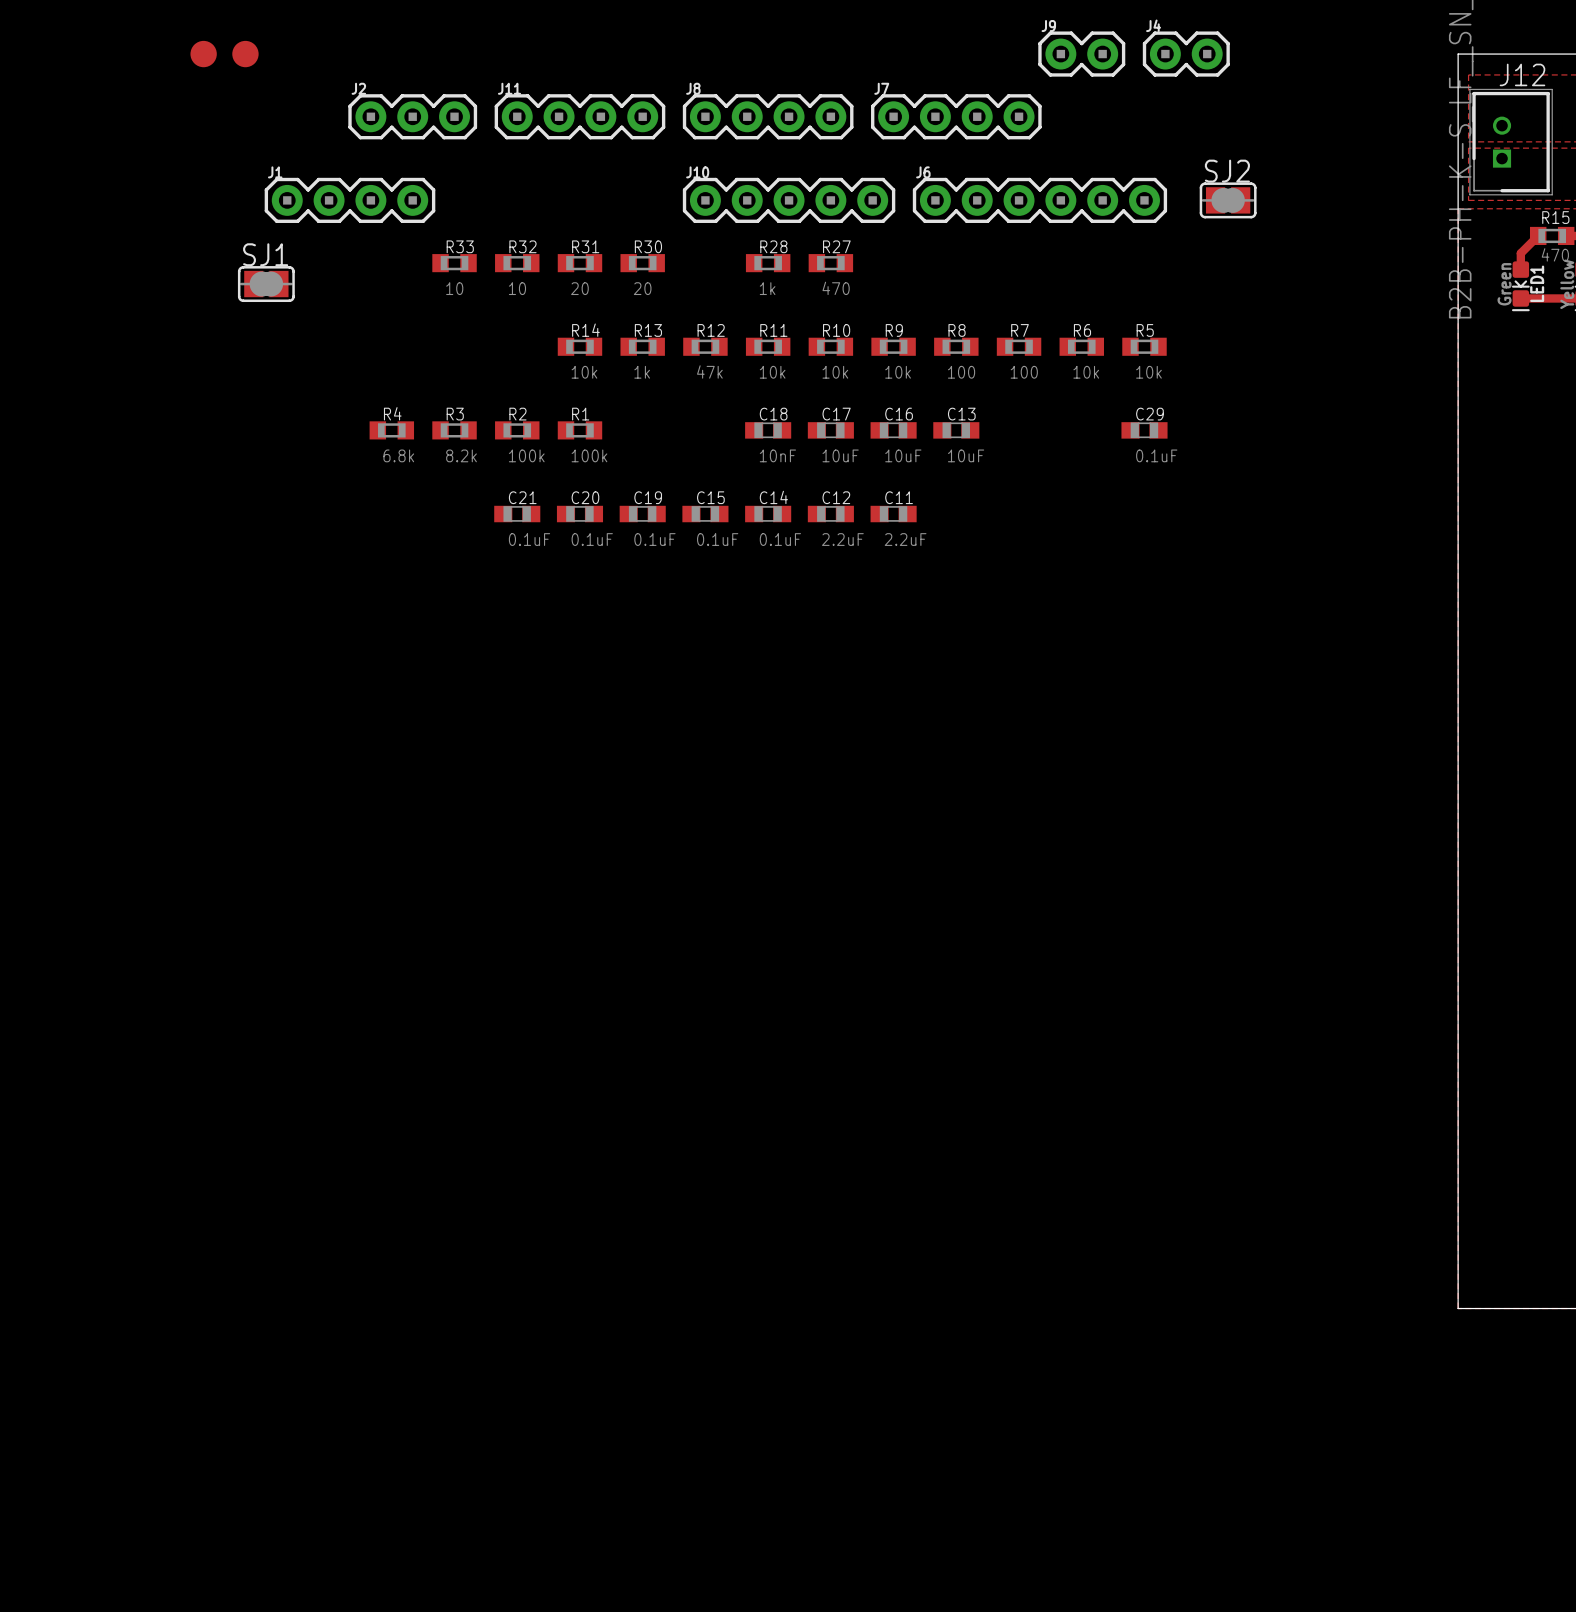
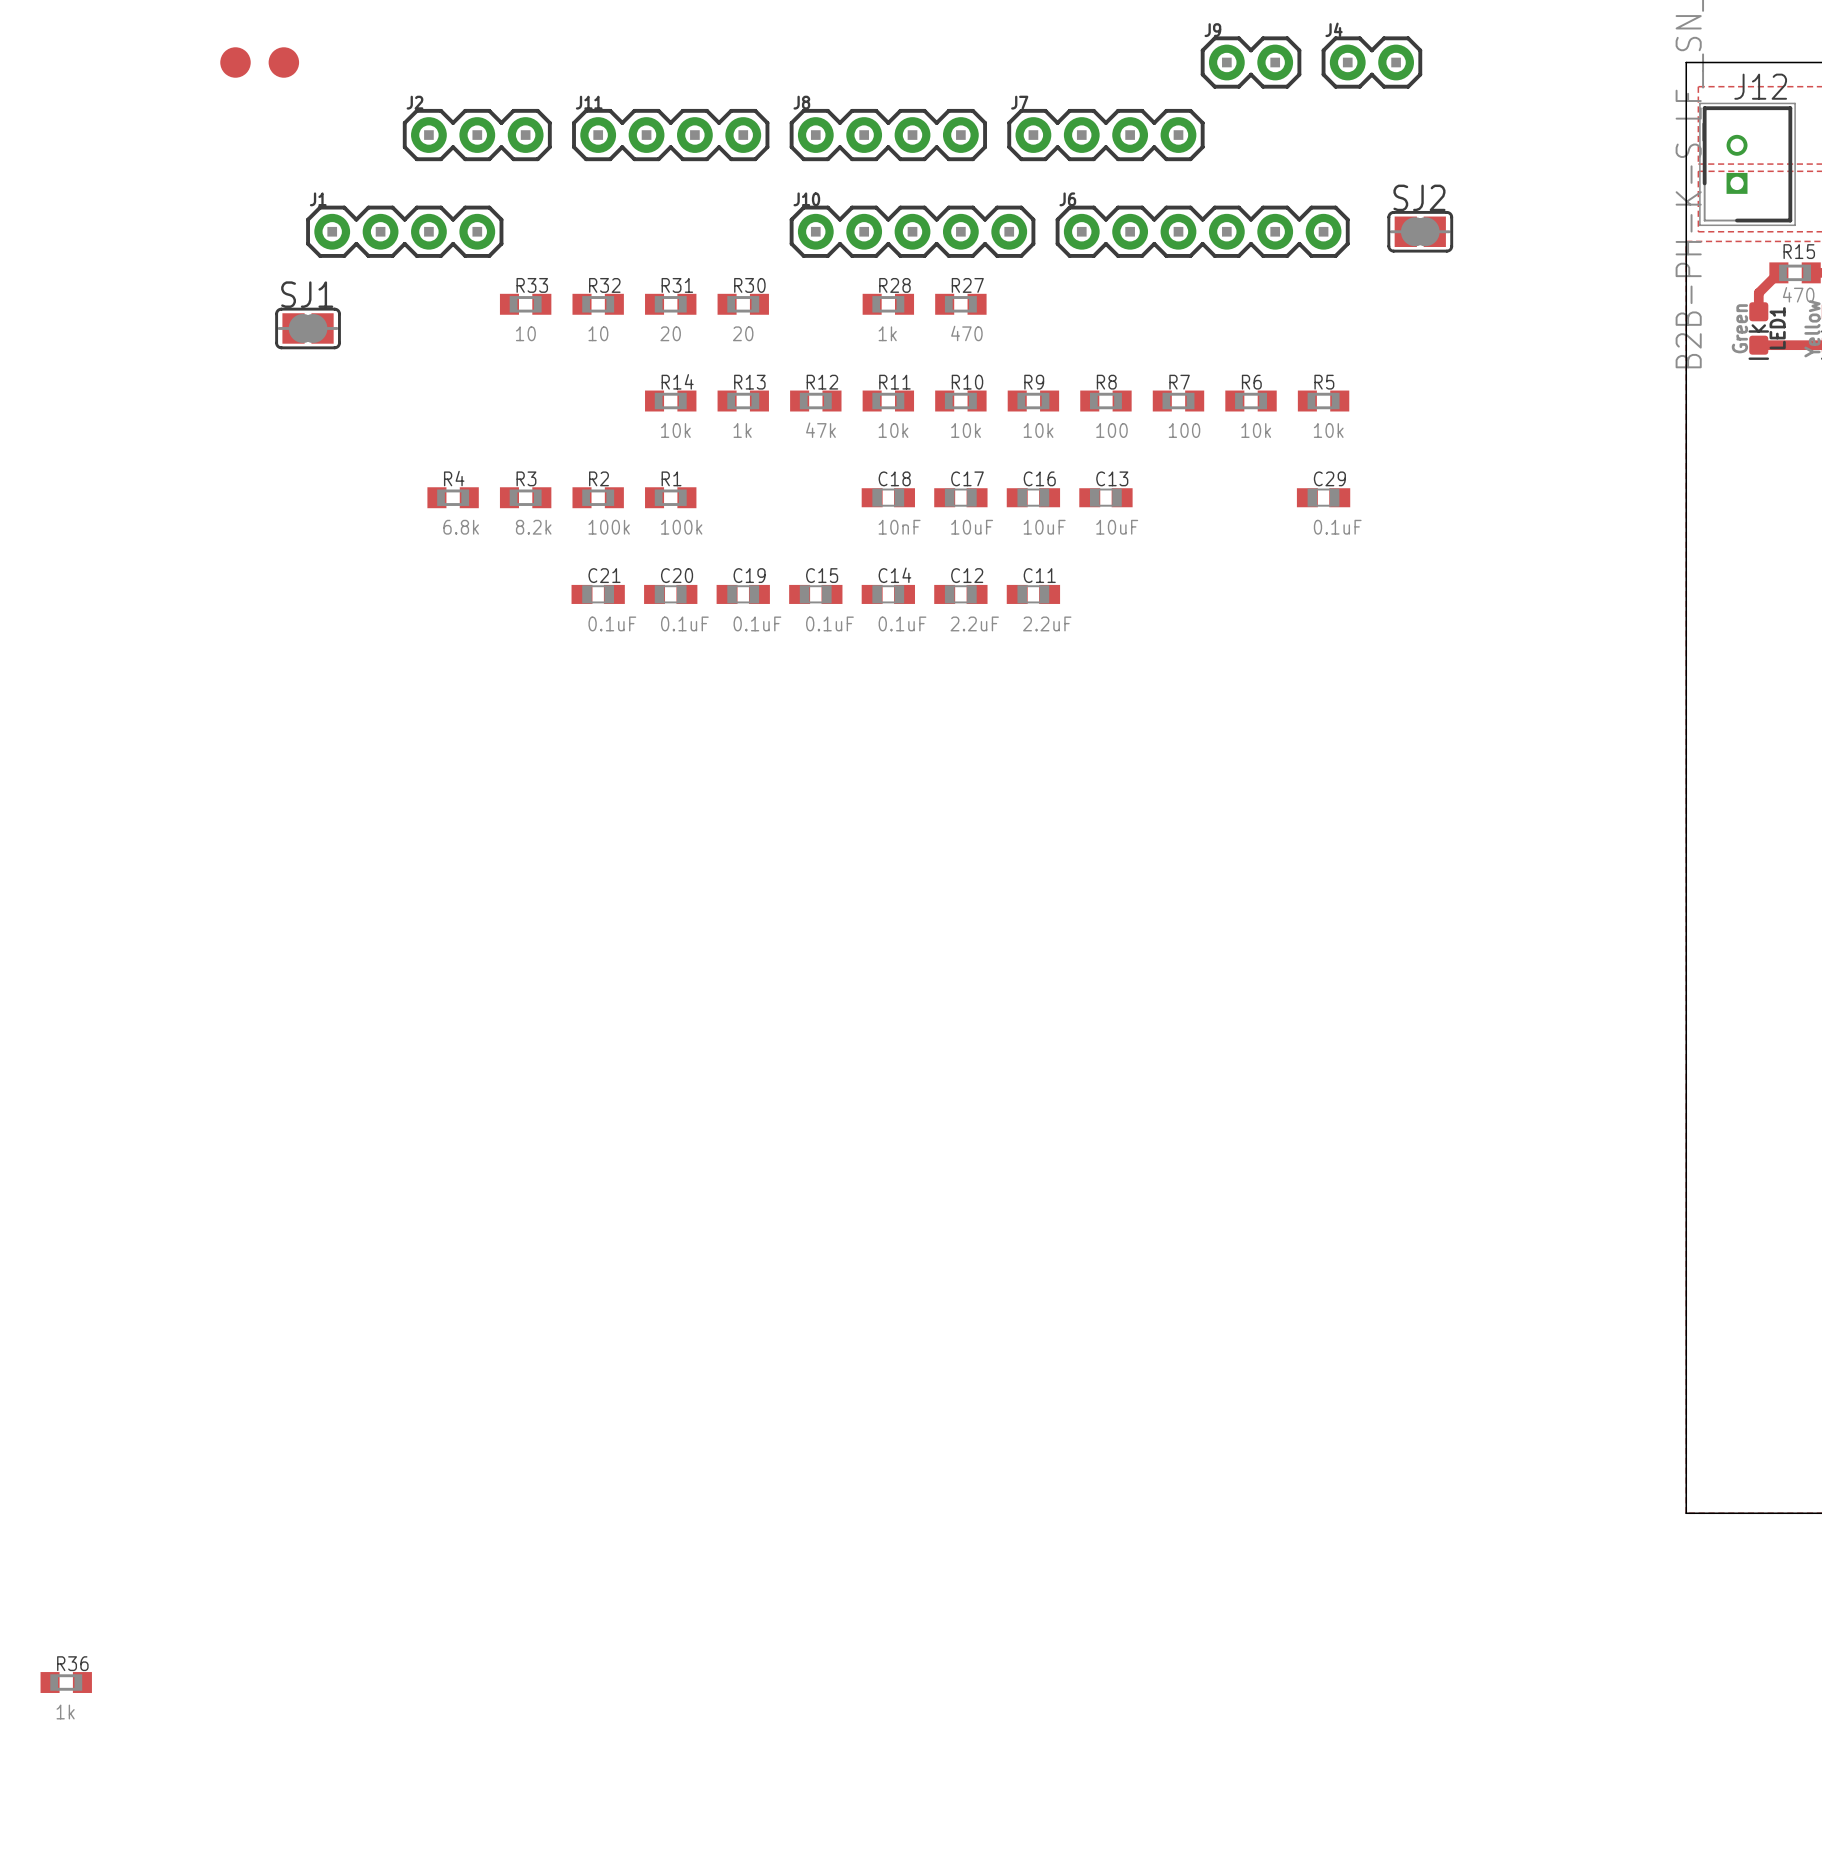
R36: none -> 1k (66, 1682)

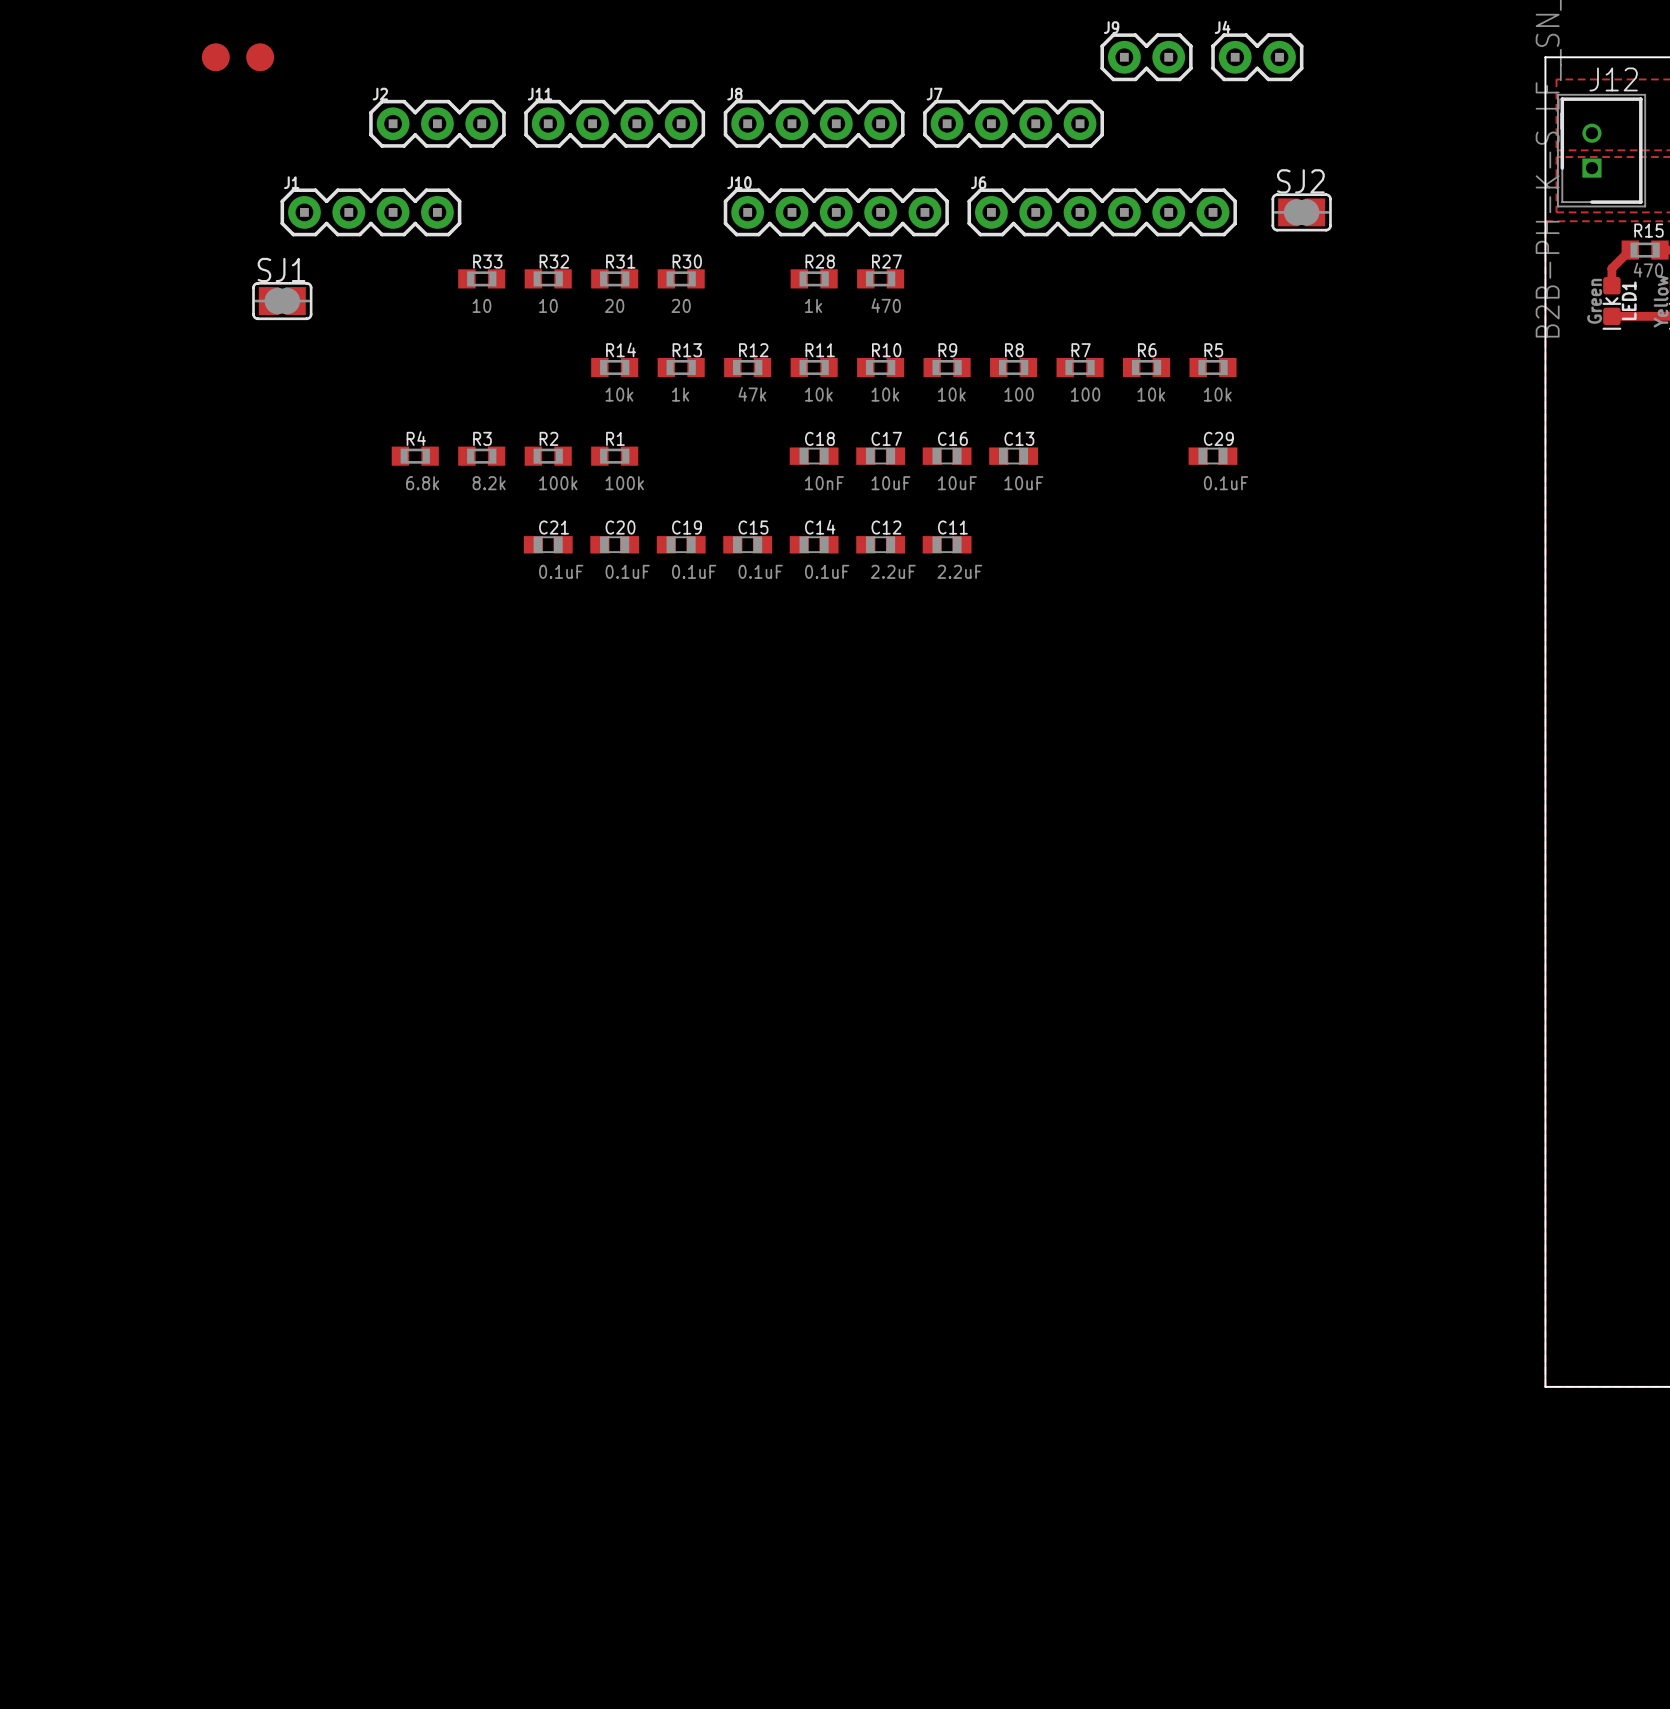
R36: 1k (66, 1682) -> none

